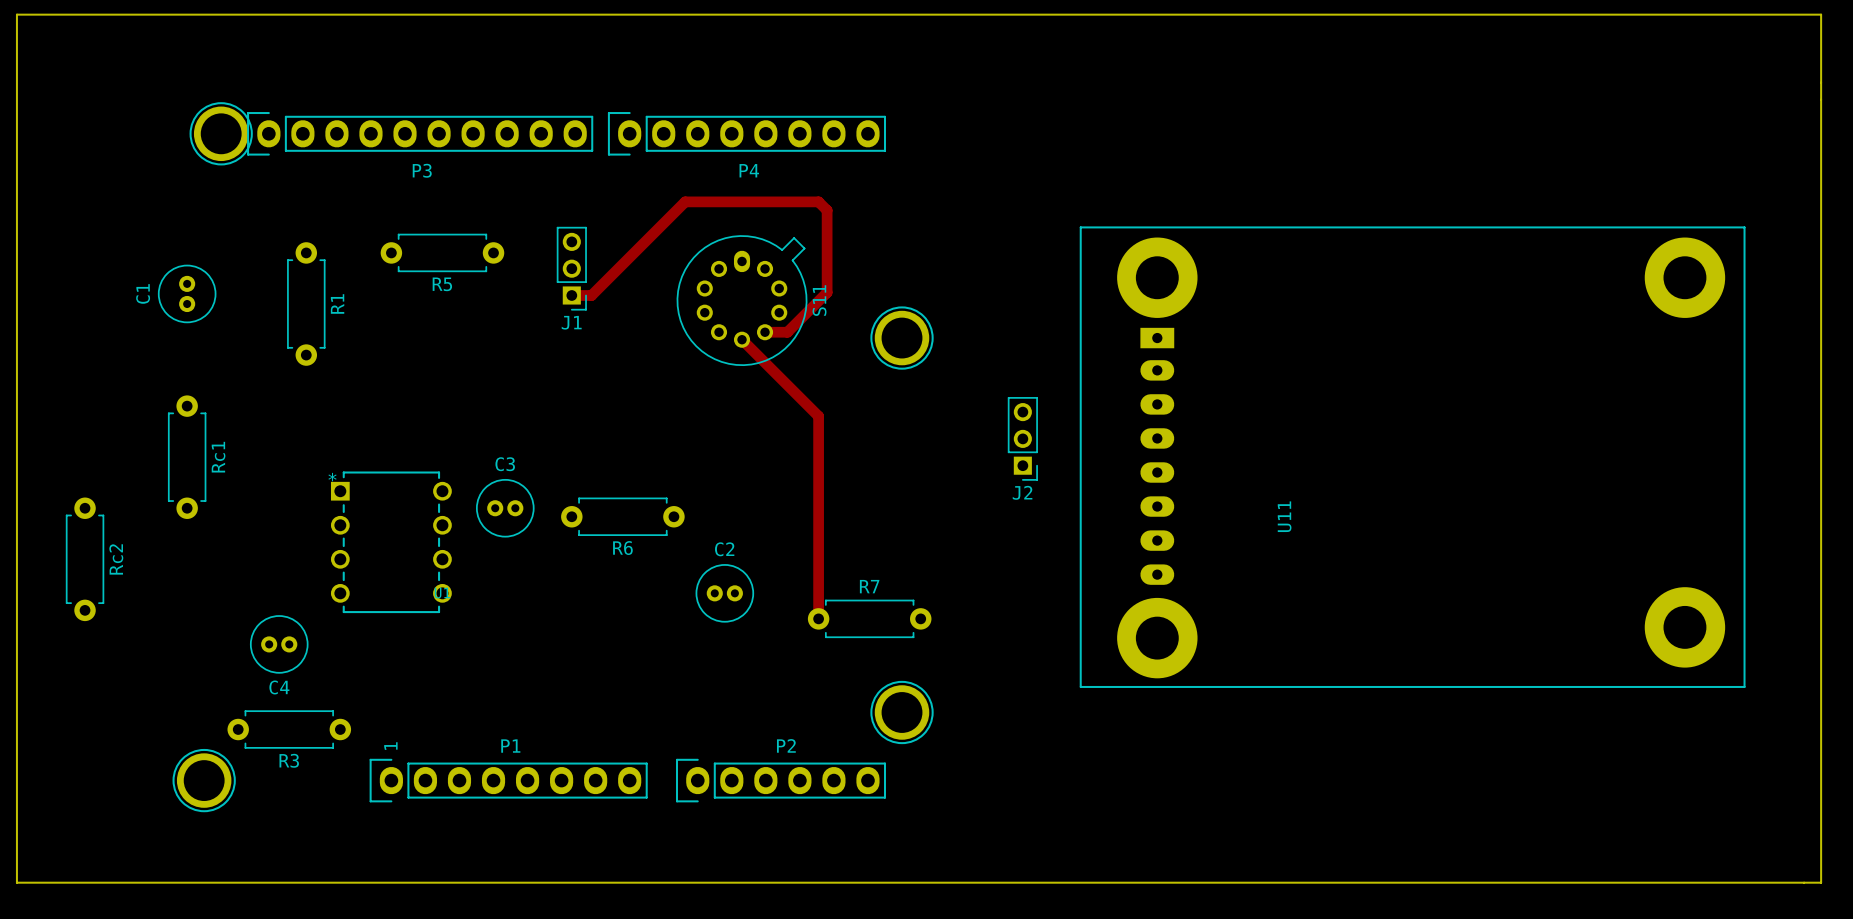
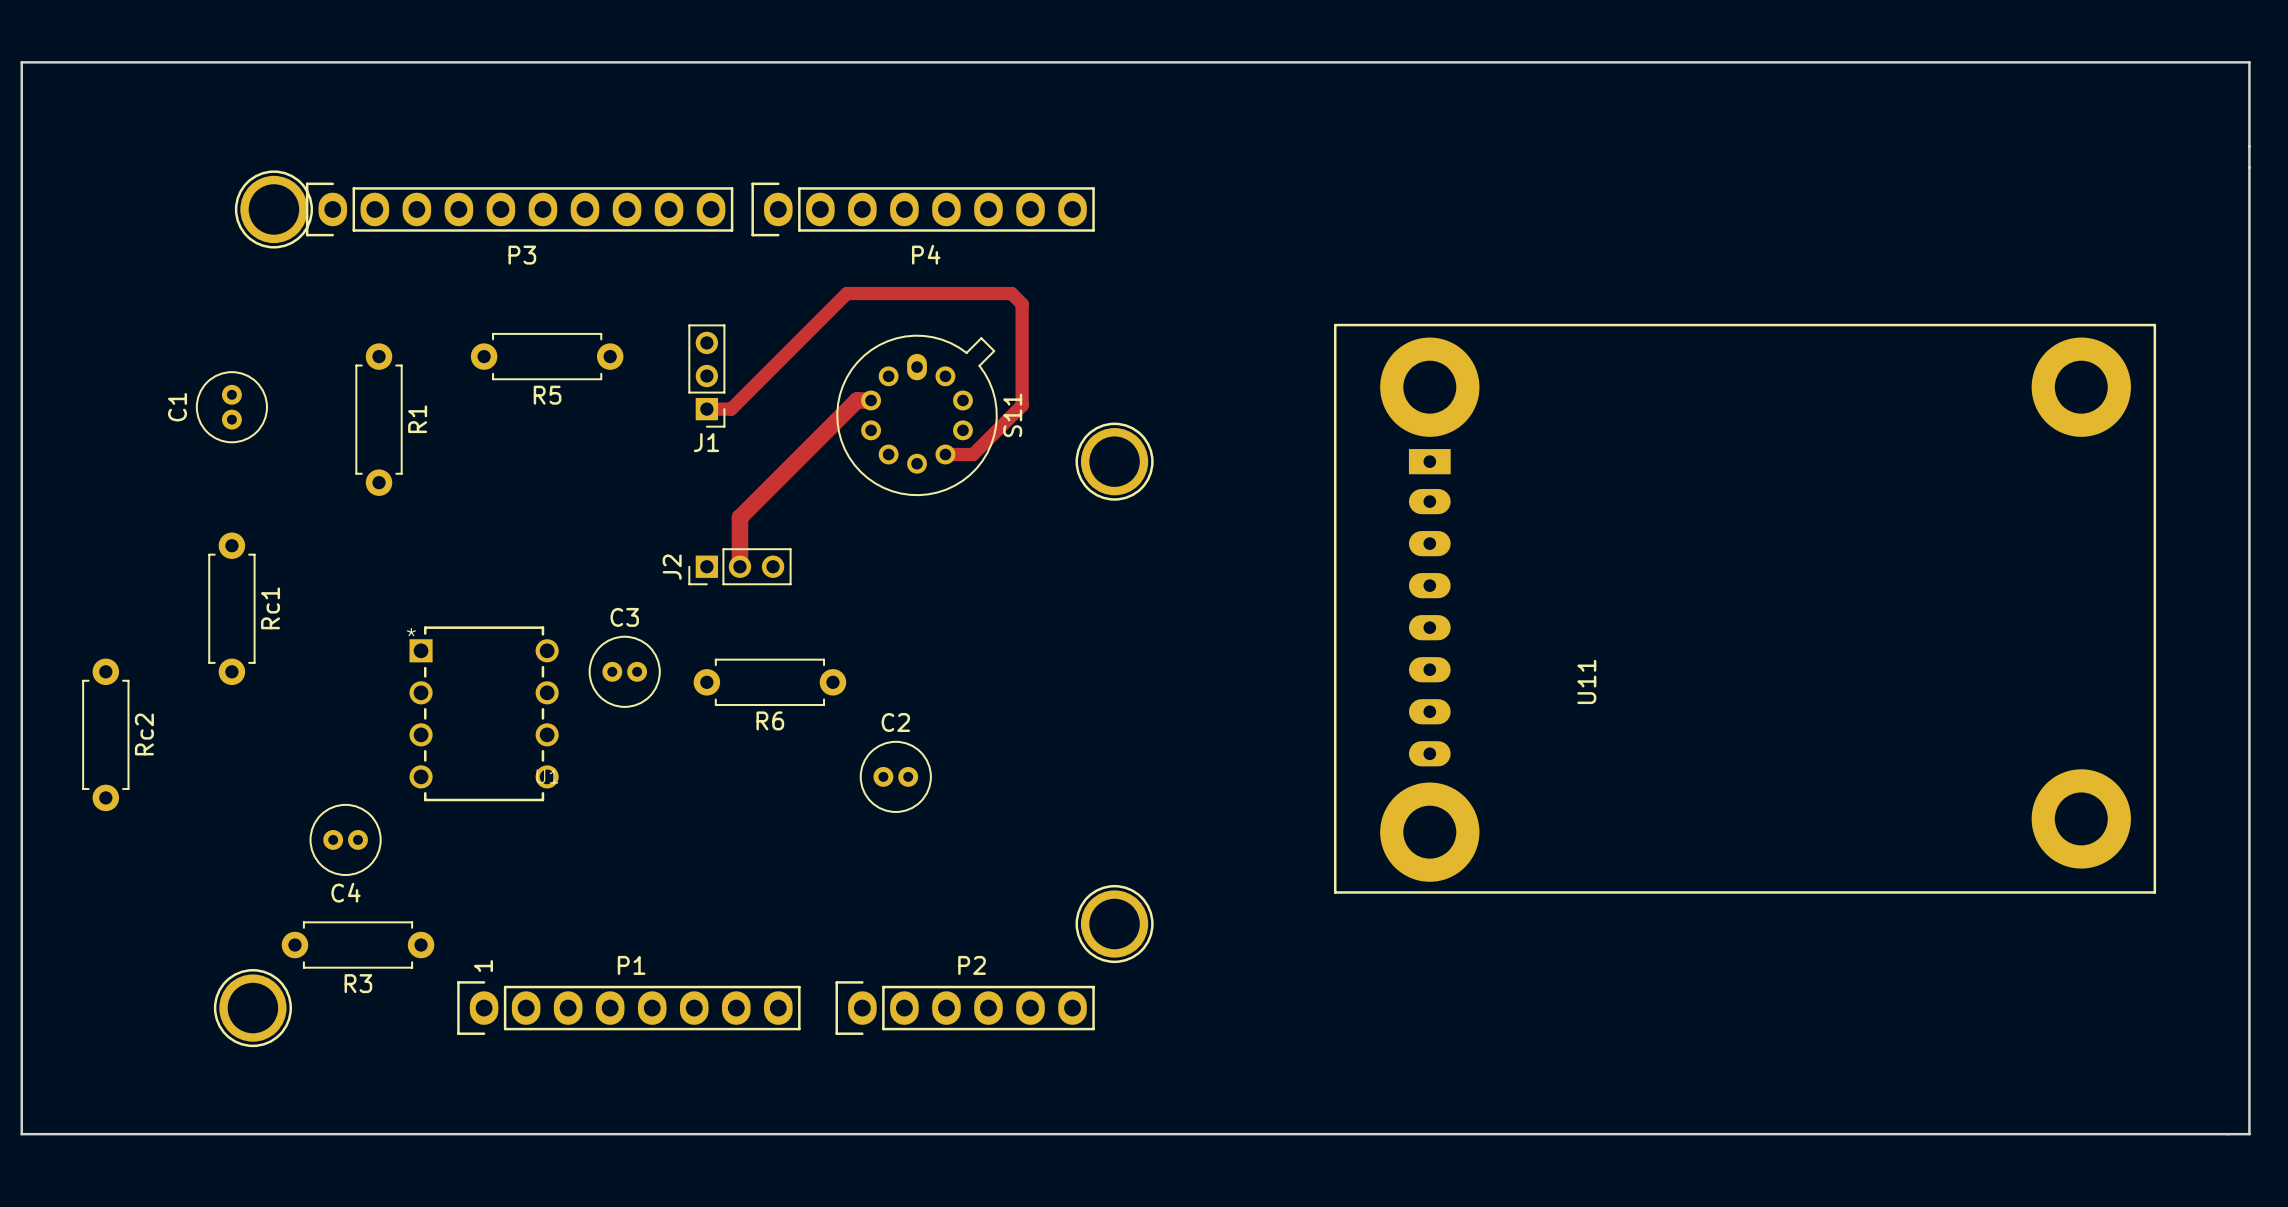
track: none -> (871, 400) (857, 400) (739, 517) (739, 566)
track: (742, 339) (818, 416) (818, 618) -> none
J2 rotation: 0° (1022, 438) -> 90° clockwise (739, 566)
J2 position: (1022, 438) -> (739, 566)
R7: (869, 618) -> none

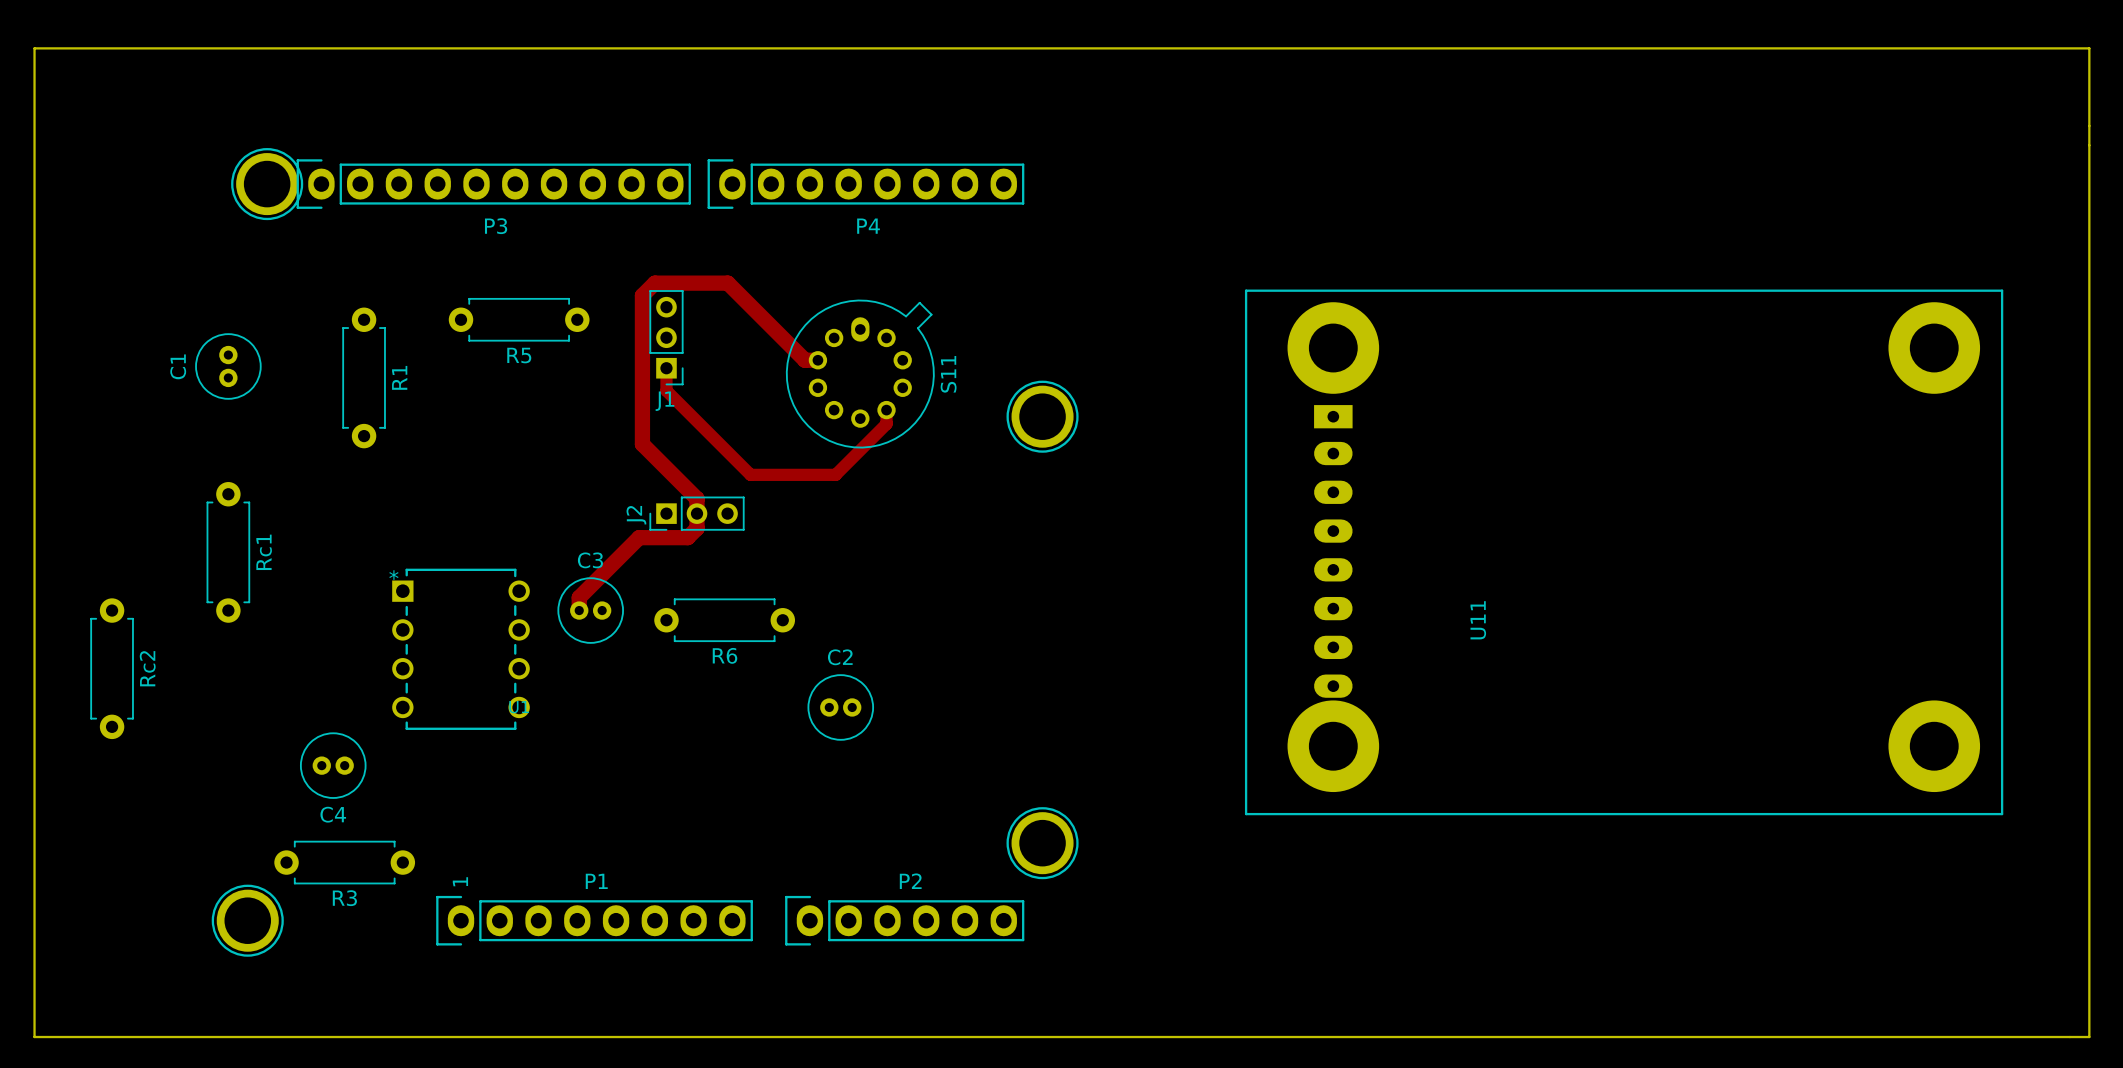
U11 footprint: [1333, 323, 2157, 894] -> [1244, 289, 2004, 816]
track: (857, 400) (739, 517) (739, 550) -> (804, 360) (727, 283) (654, 283) (642, 295) (642, 444) (697, 498)
track: (706, 409) (731, 409) (846, 293) (1011, 293) (1022, 304) (1022, 405) (973, 454) (945, 454) -> (666, 368) (666, 390) (750, 474) (835, 474) (886, 424) (886, 410)
track: none -> (697, 513) (697, 528) (687, 537) (639, 537) (579, 597) (579, 610)

